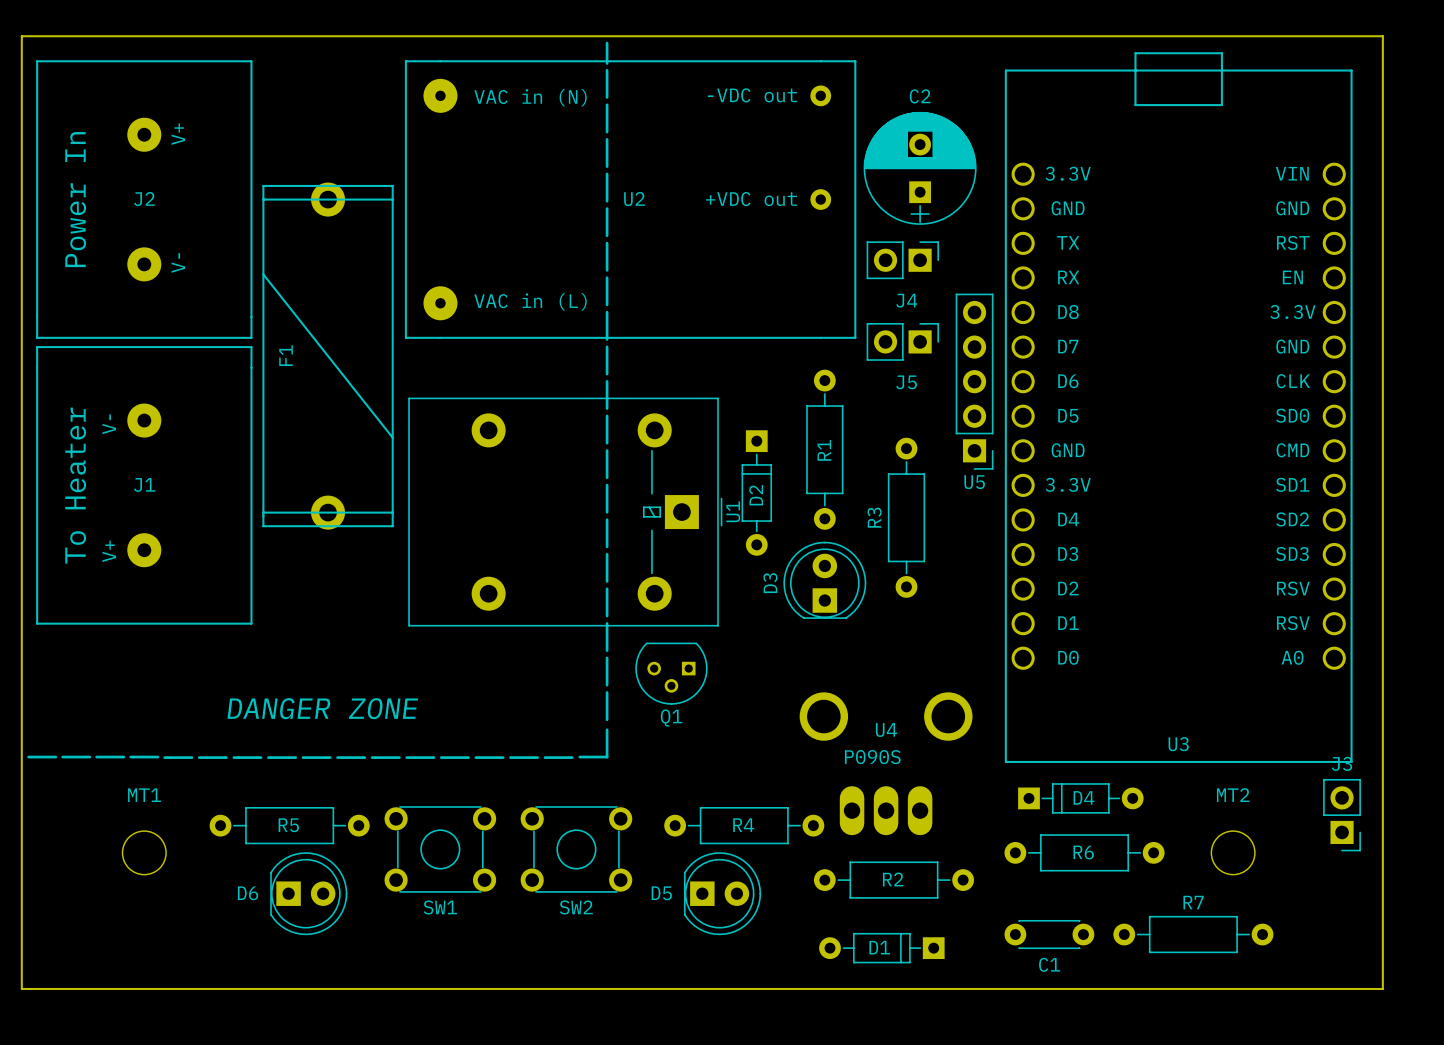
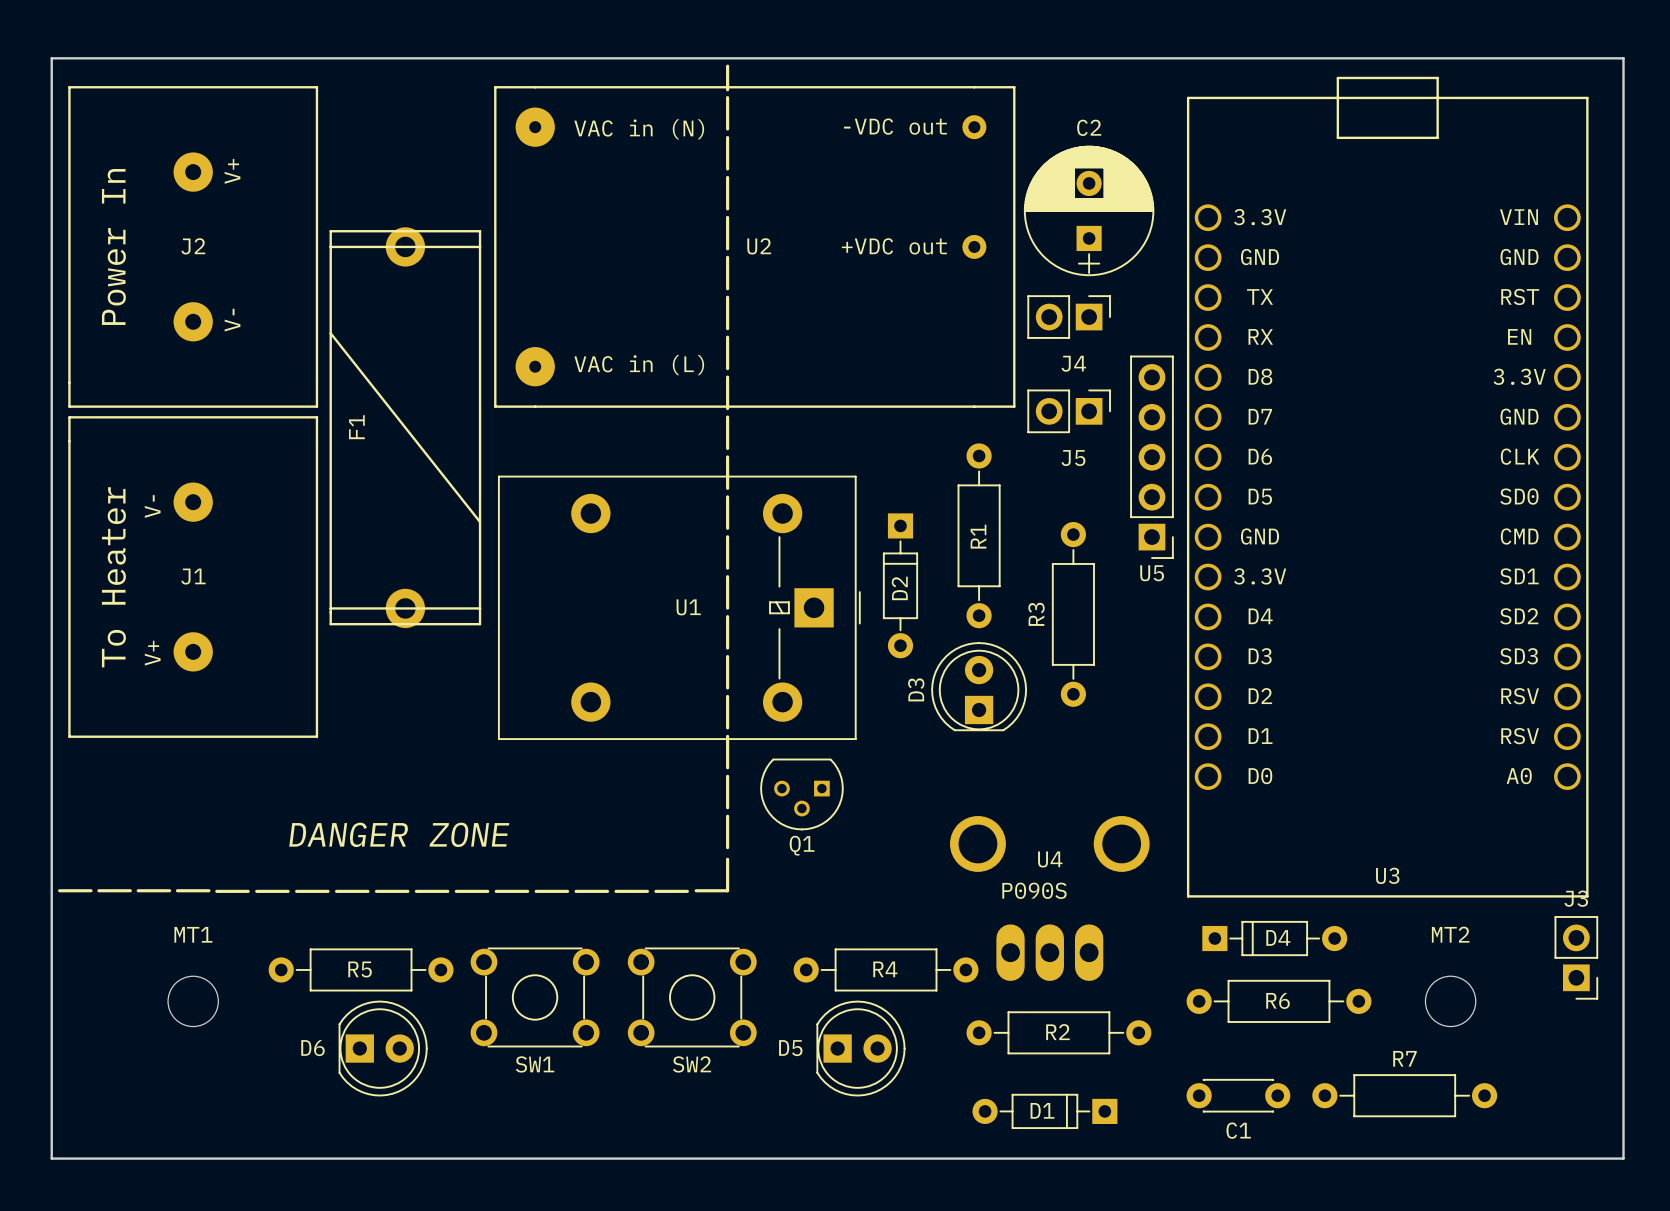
U1 name rotation: 0° (733, 511) -> 90° clockwise (688, 607)
U1 name position: U1 (733, 511) -> U1 (688, 607)

